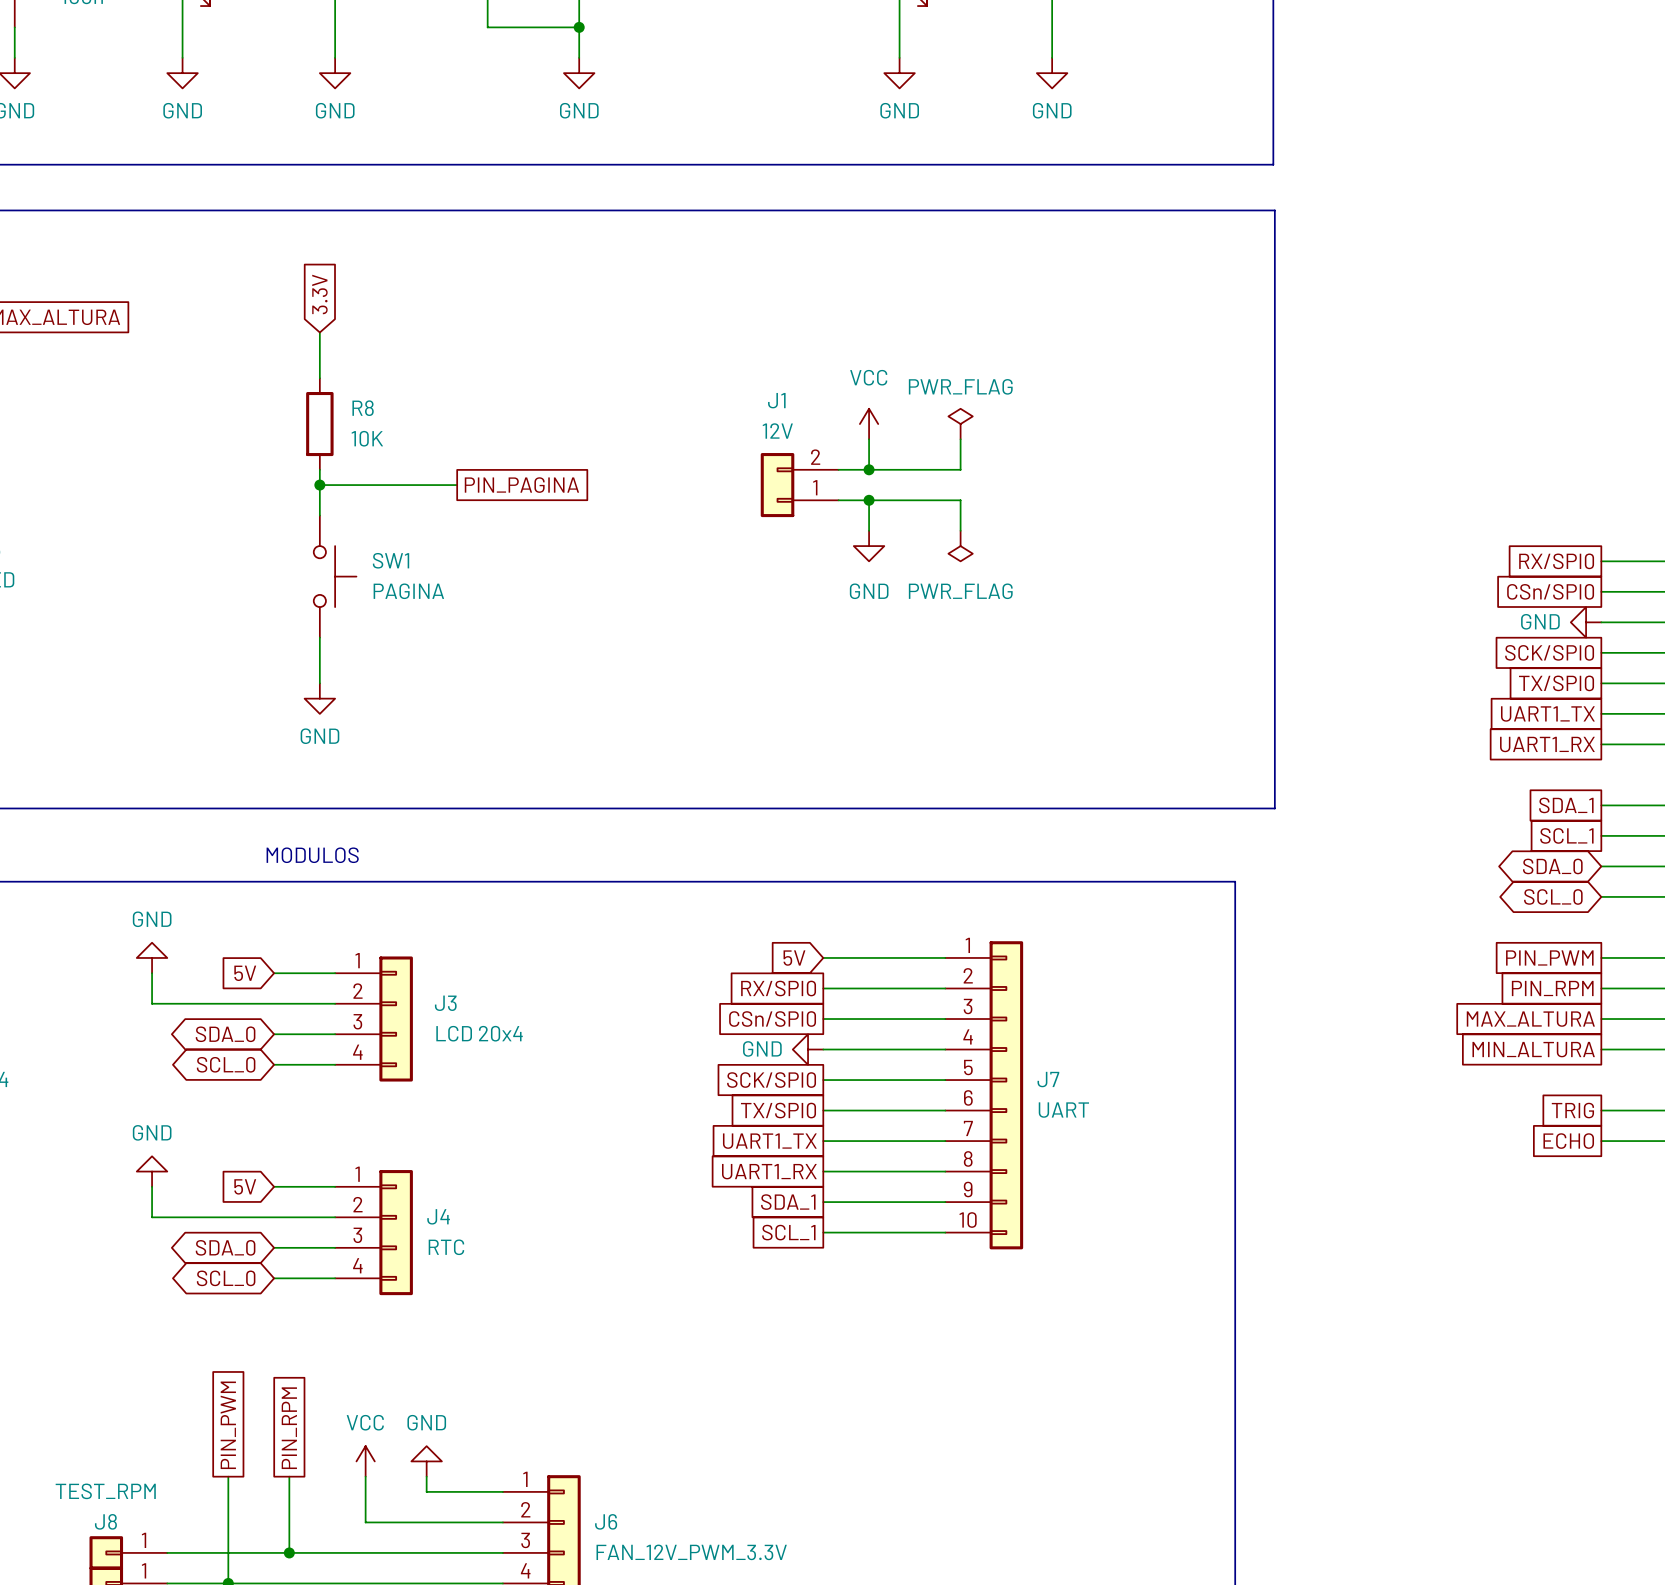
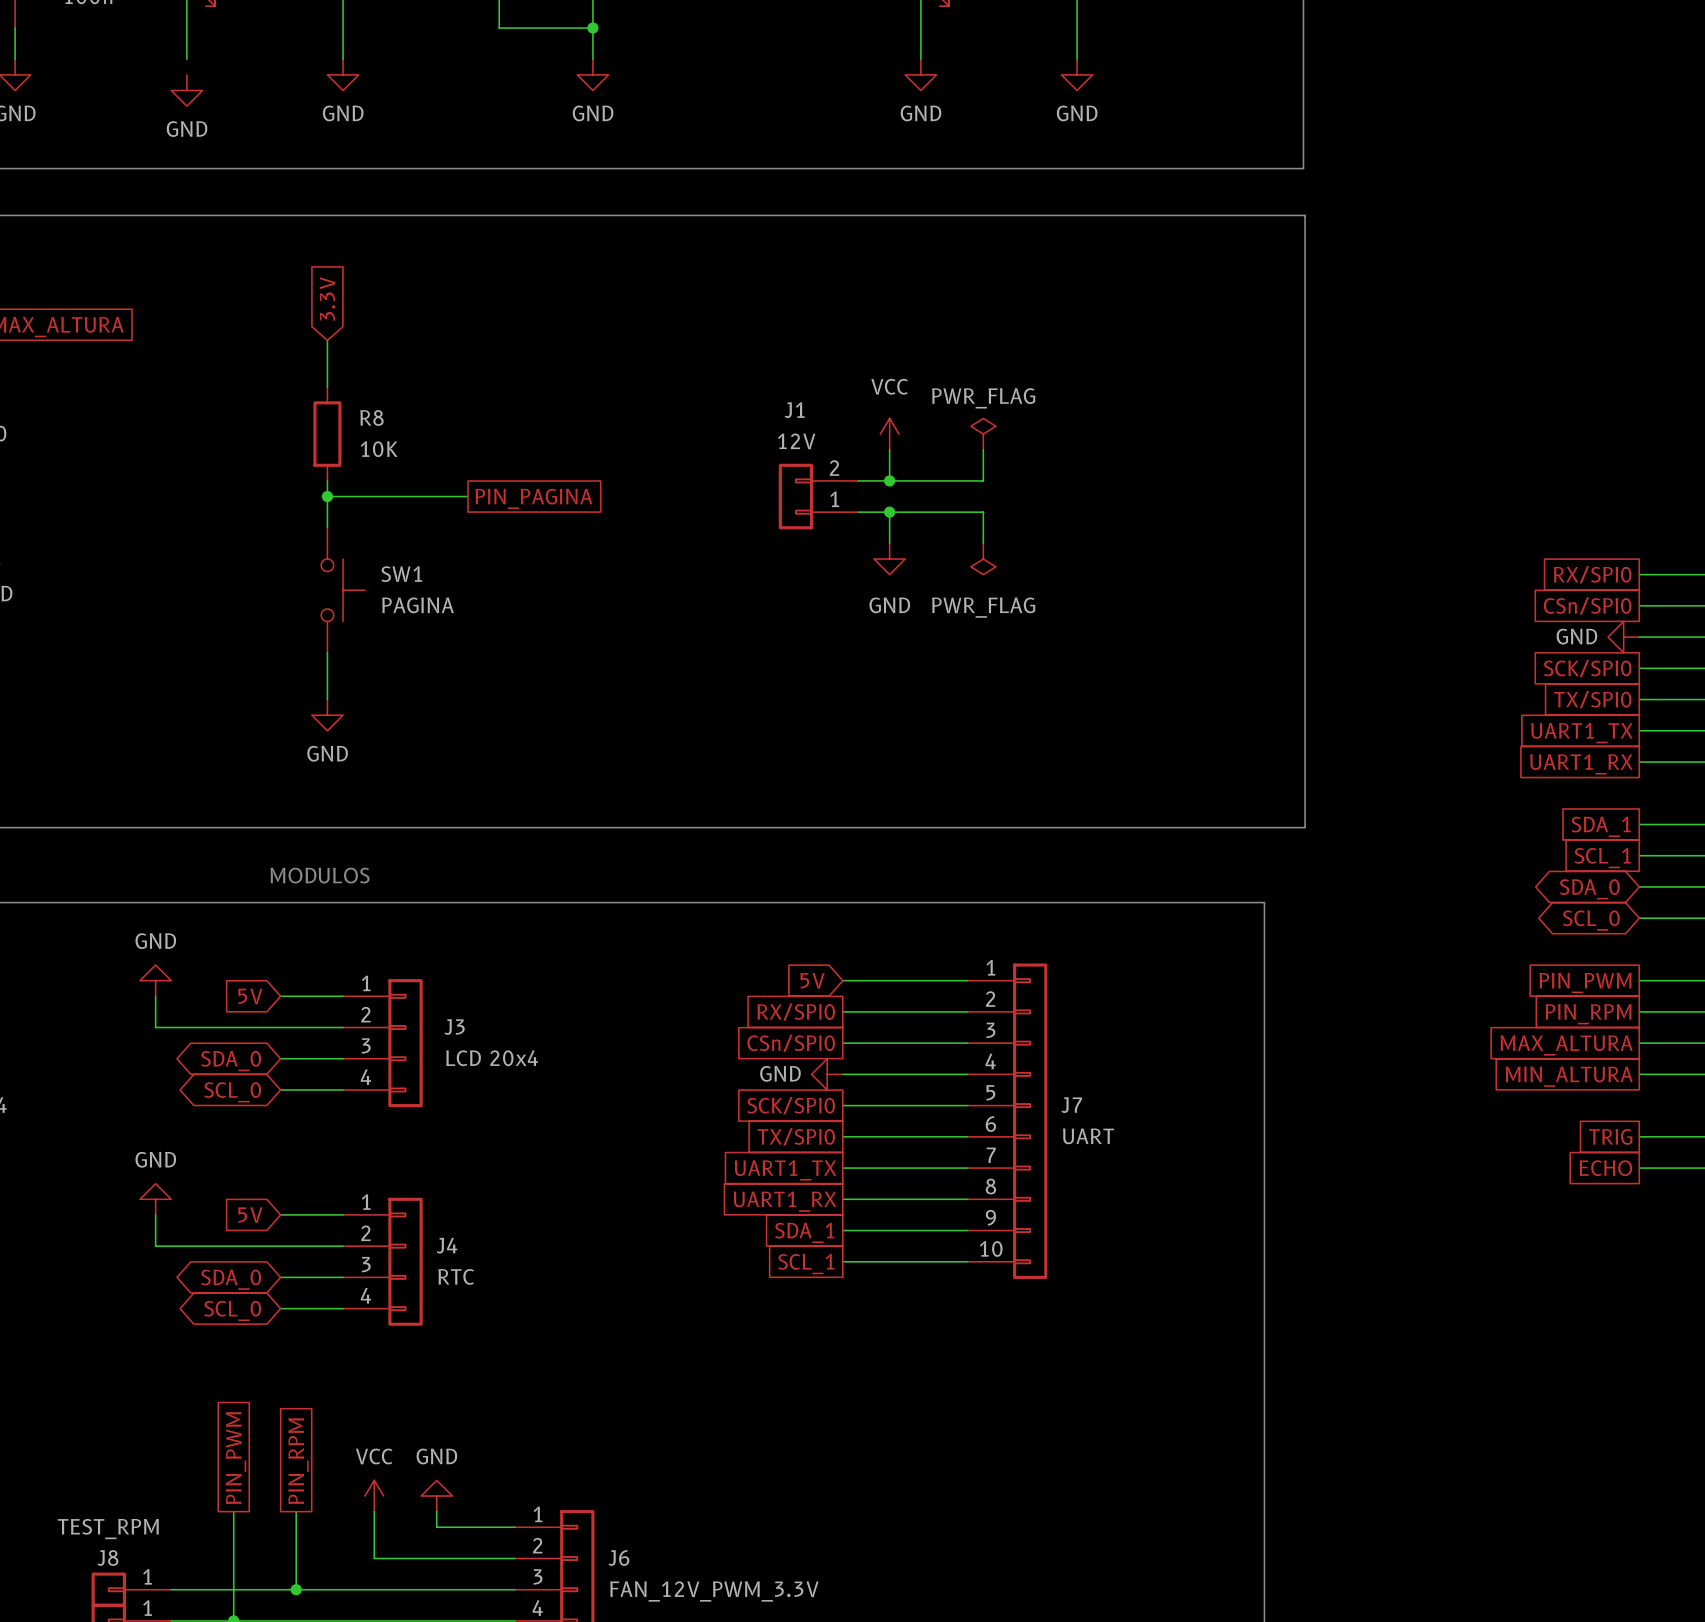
power symbol position: GND (182, 73) -> GND (186, 90)

